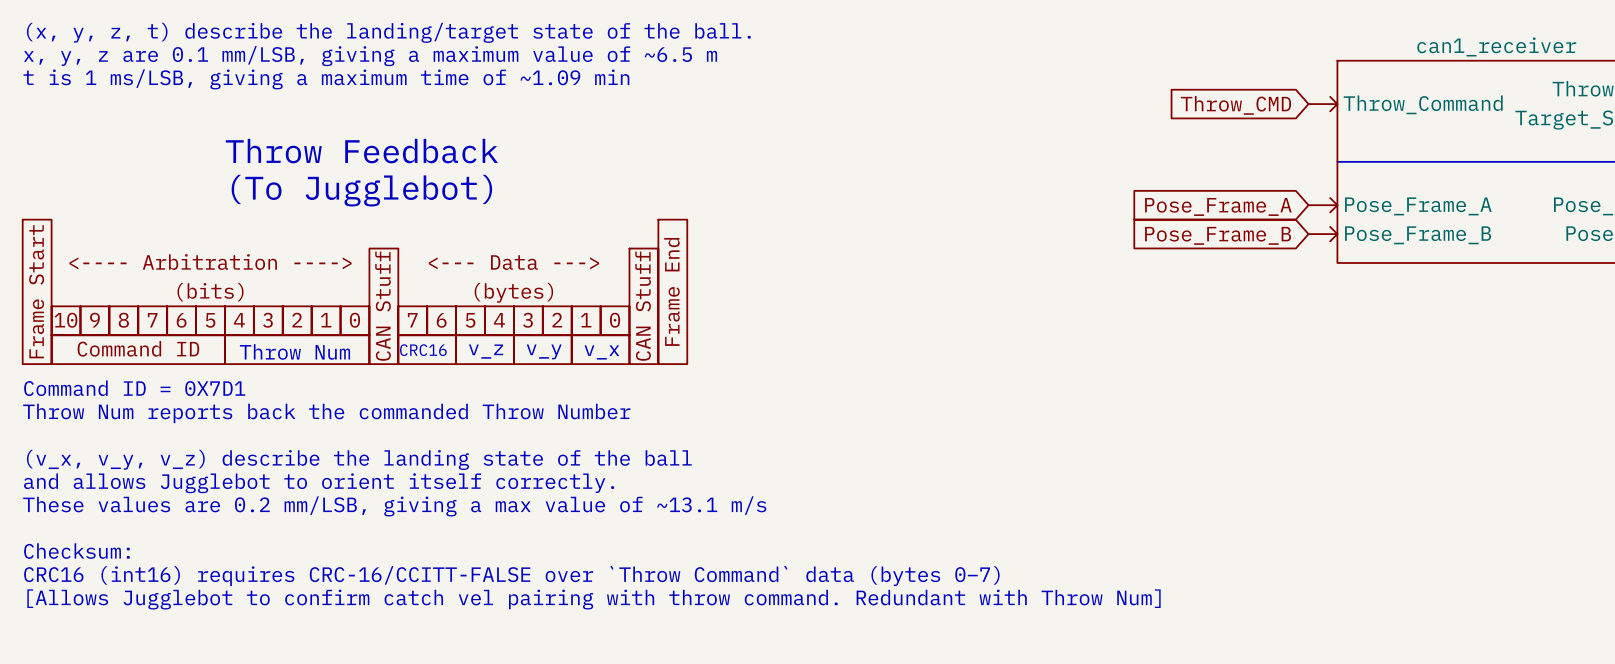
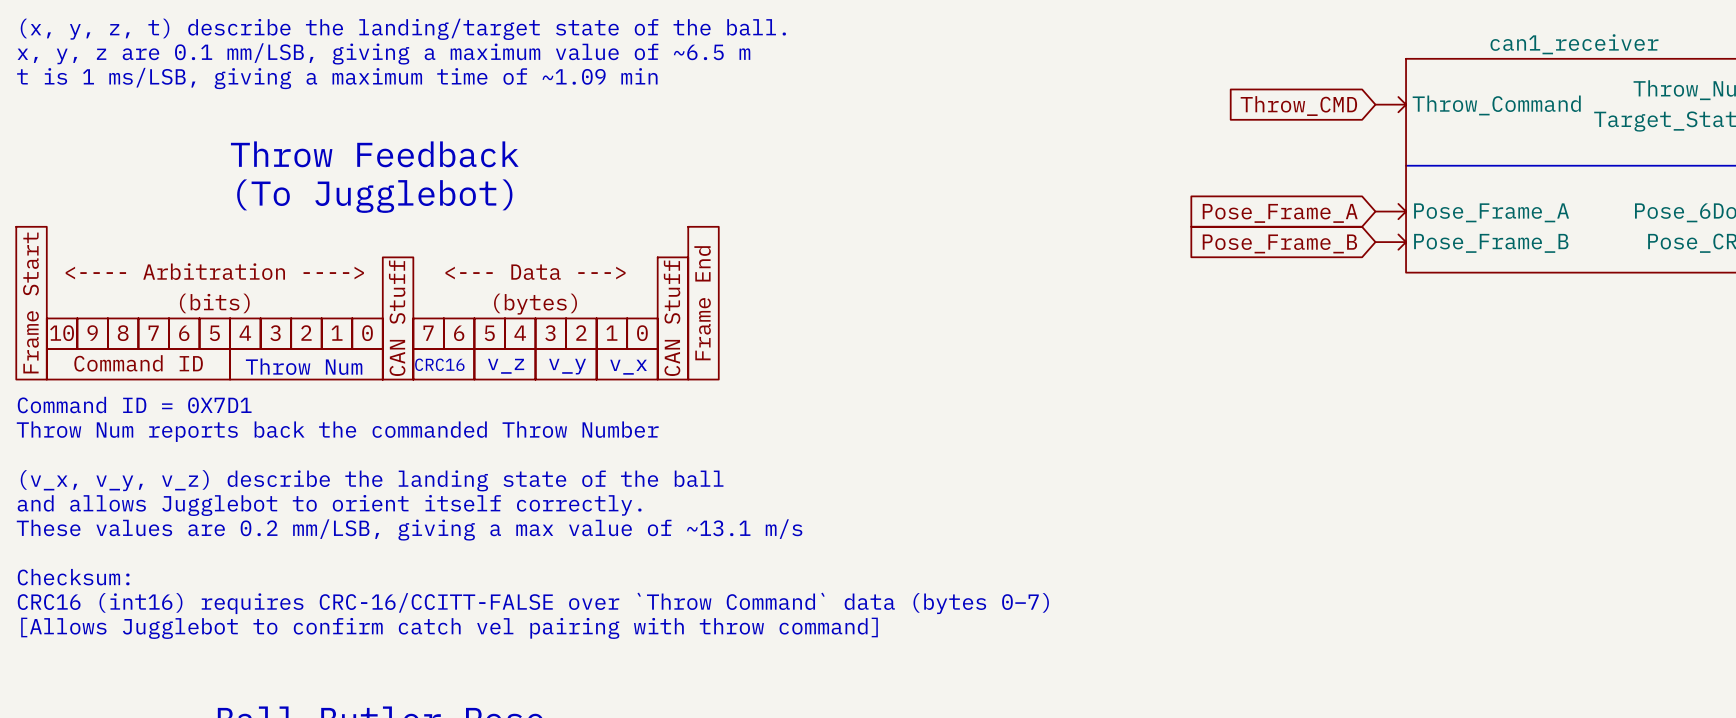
text: [Allows Jugglebot to confirm catch vel pairing with throw command. Redundant with Throw Num] (593, 599) -> [Allows Jugglebot to confirm catch vel pairing with throw command] (449, 628)

